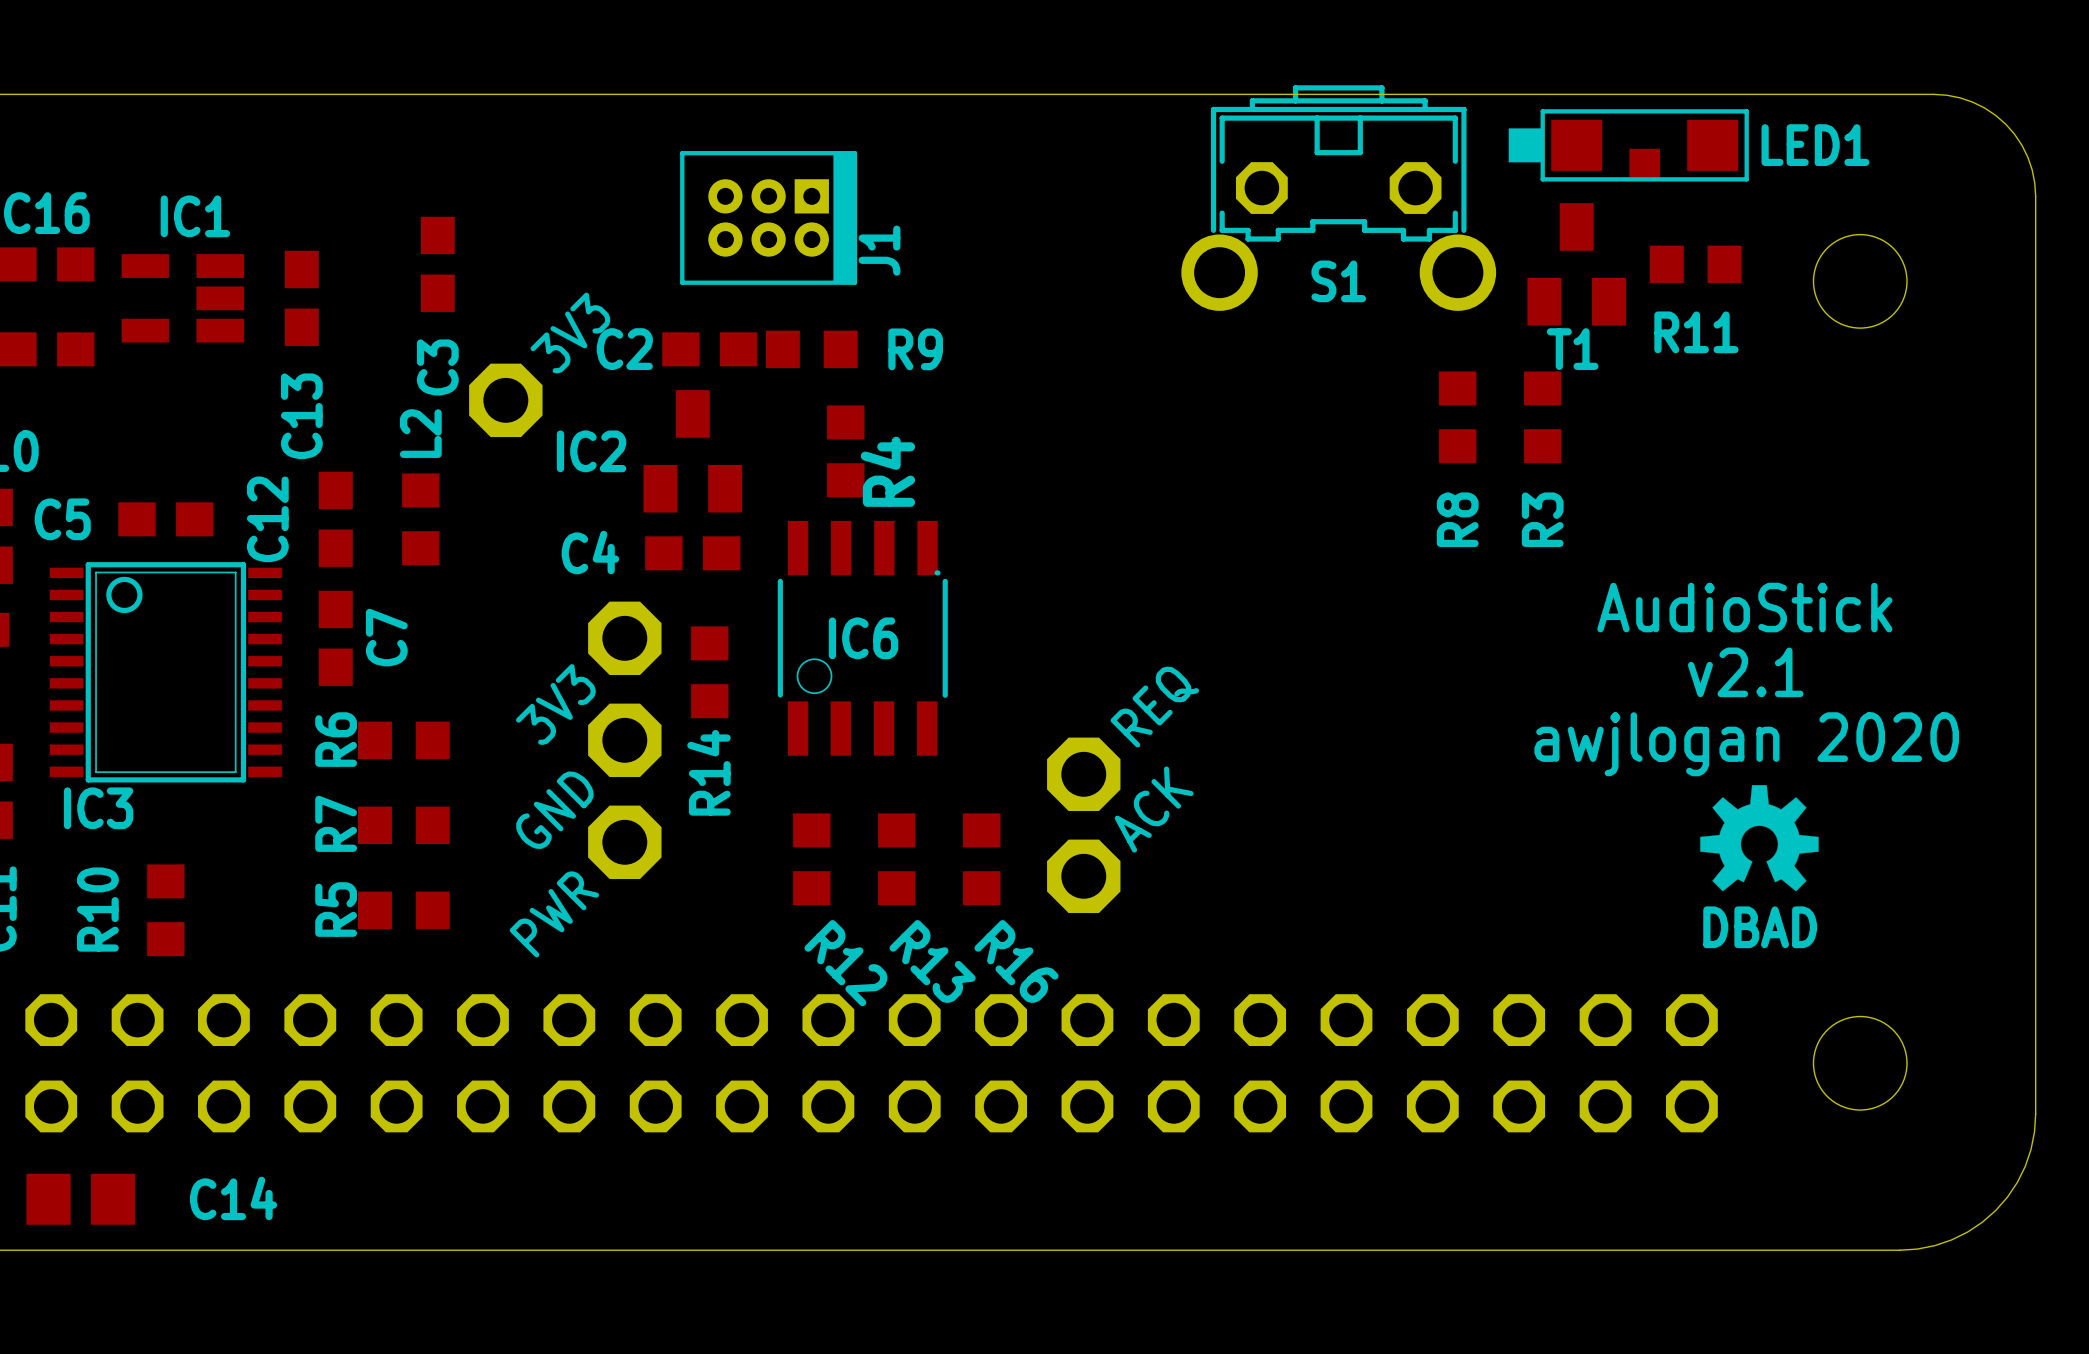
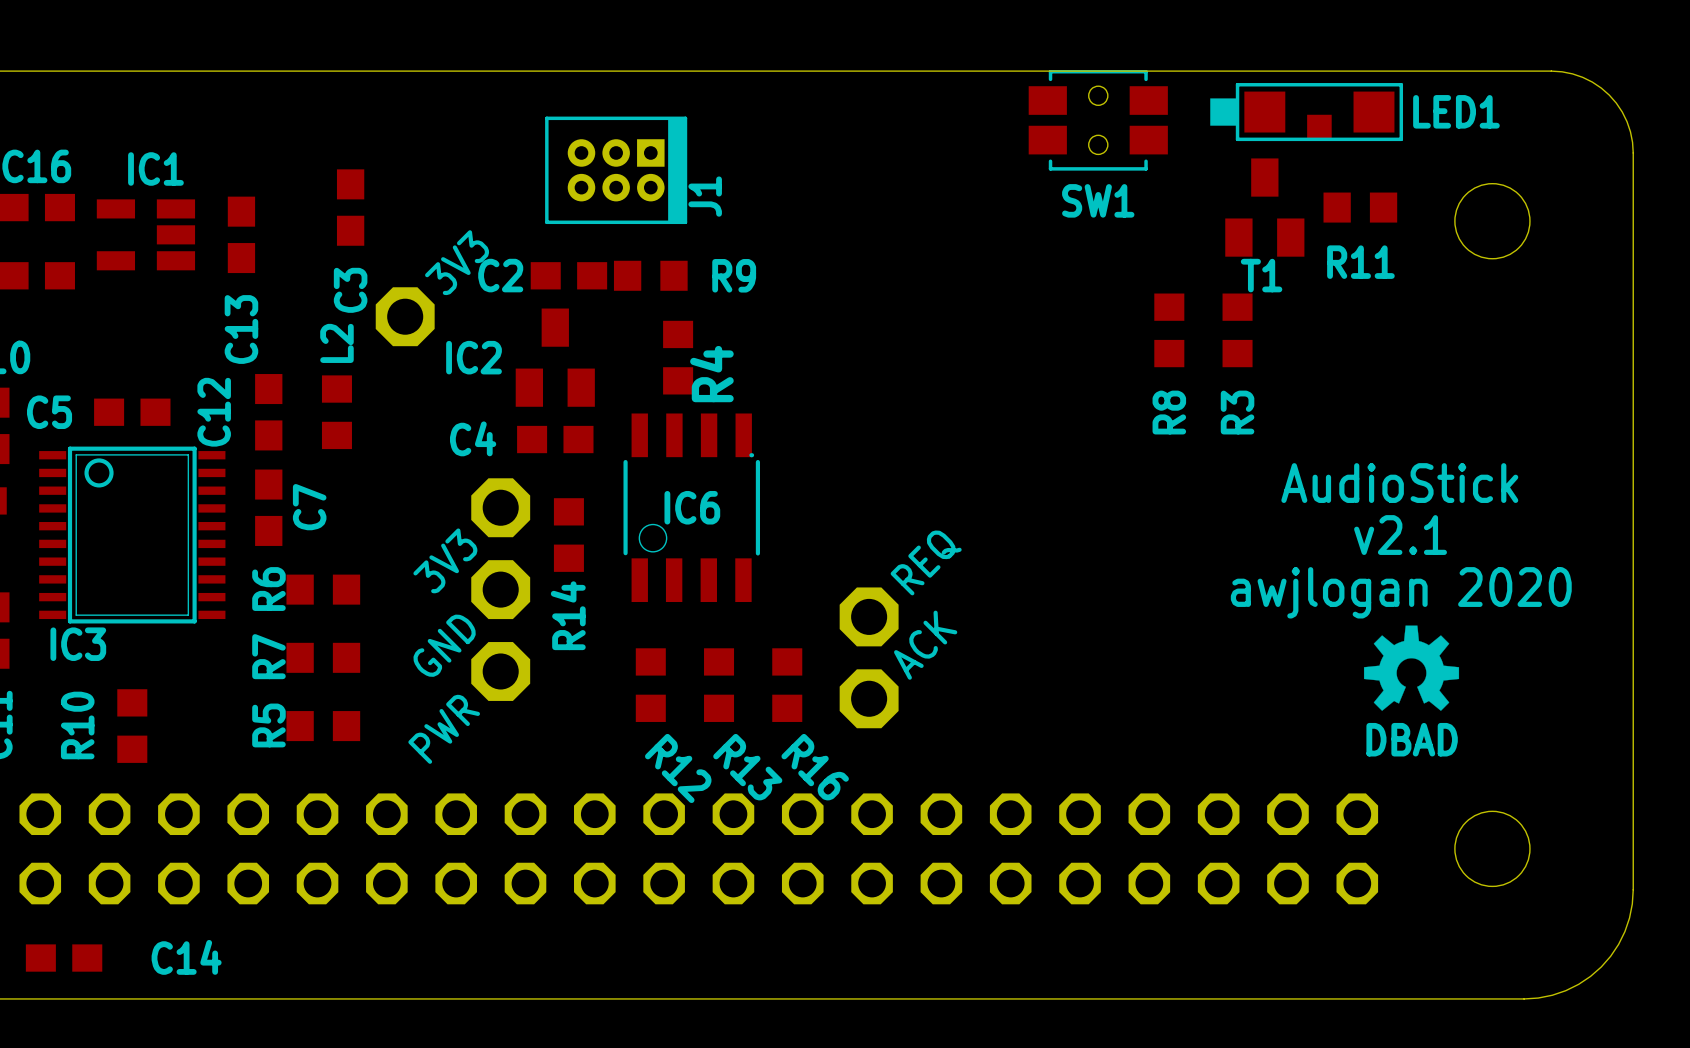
SW1: none -> (1098, 120)
S1: (1338, 198) -> none
C14 footprint: [26, 1173, 136, 1225] -> [25, 944, 103, 972]

